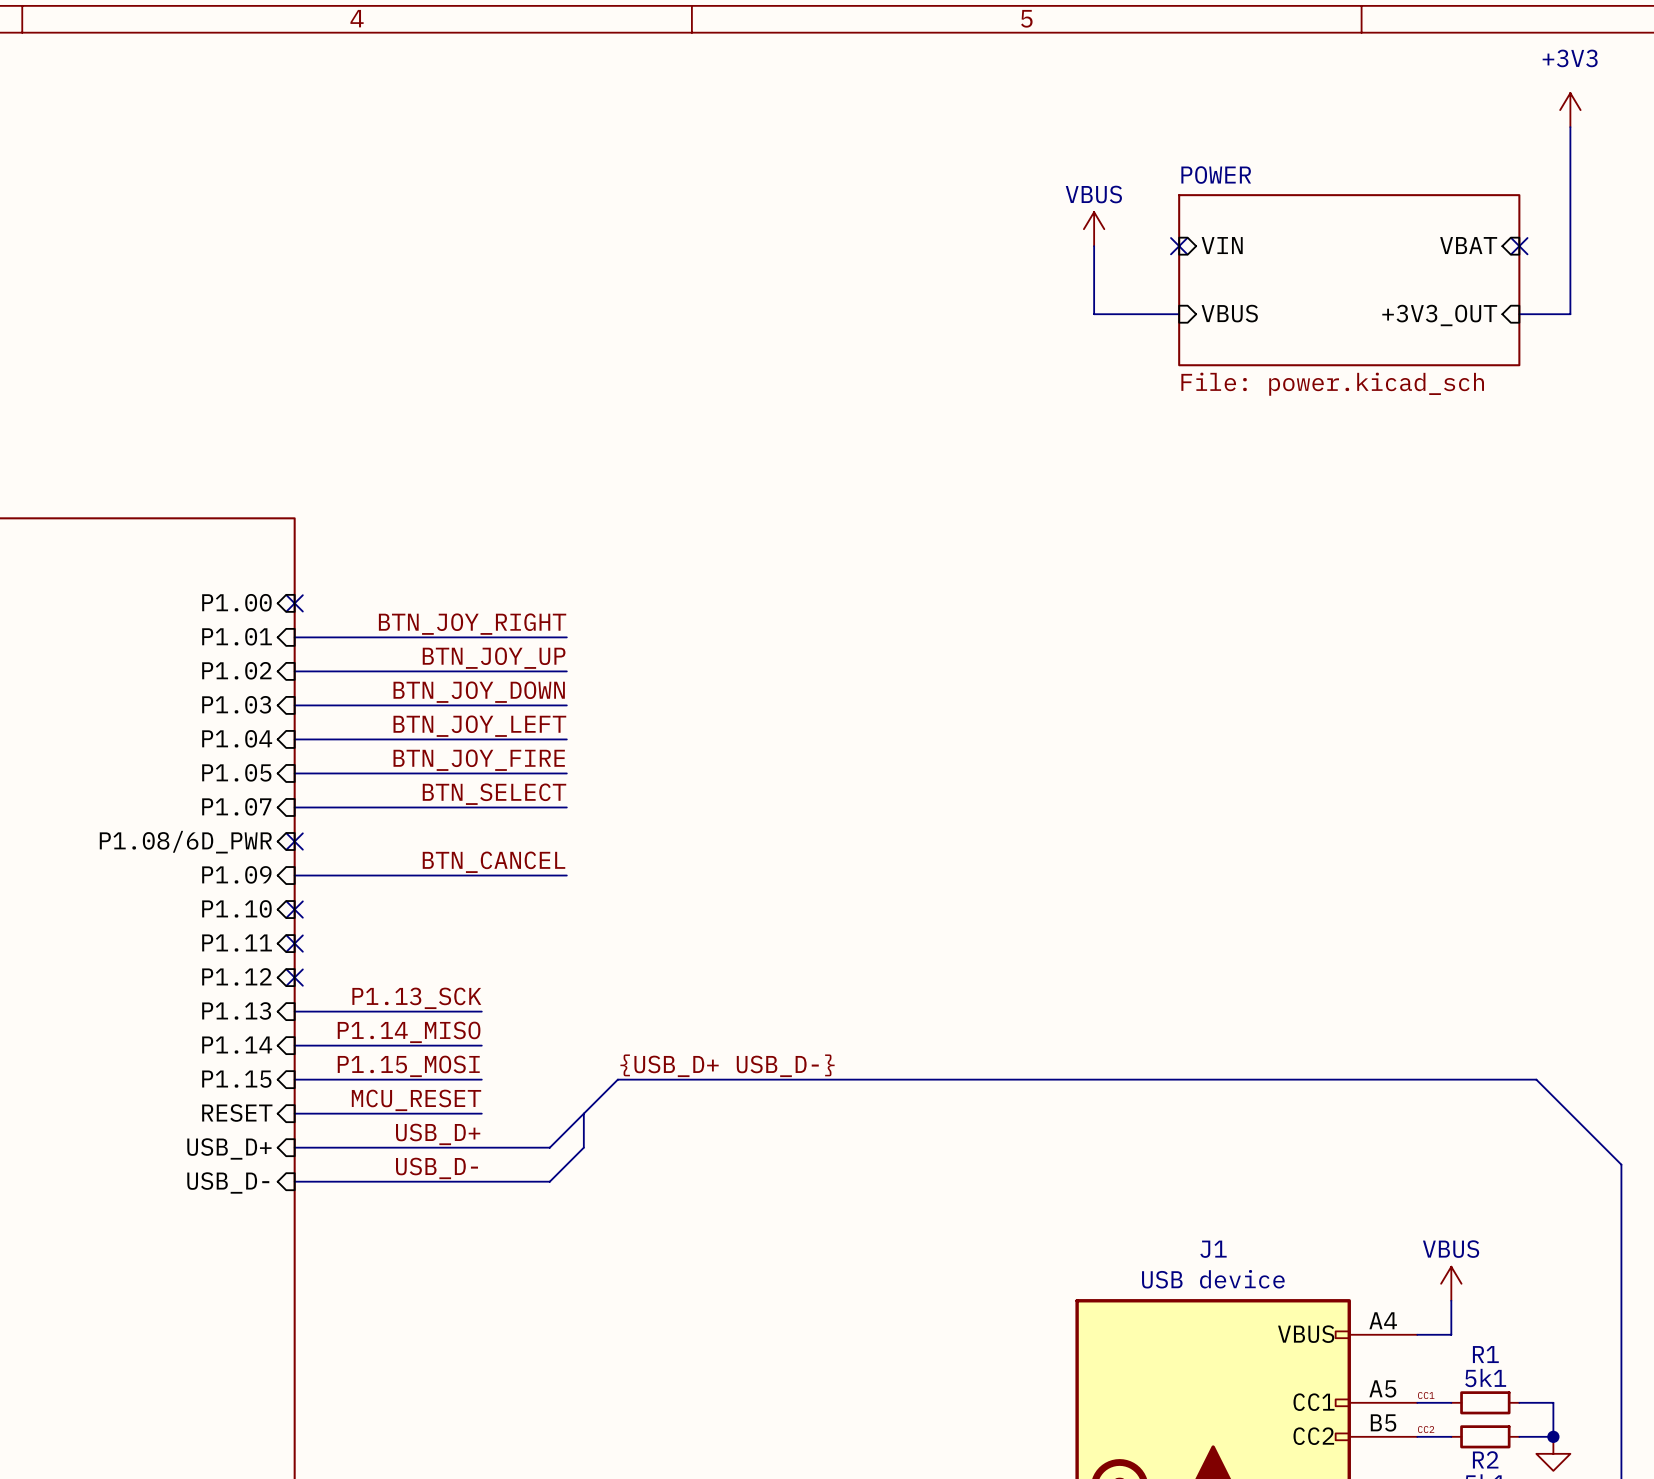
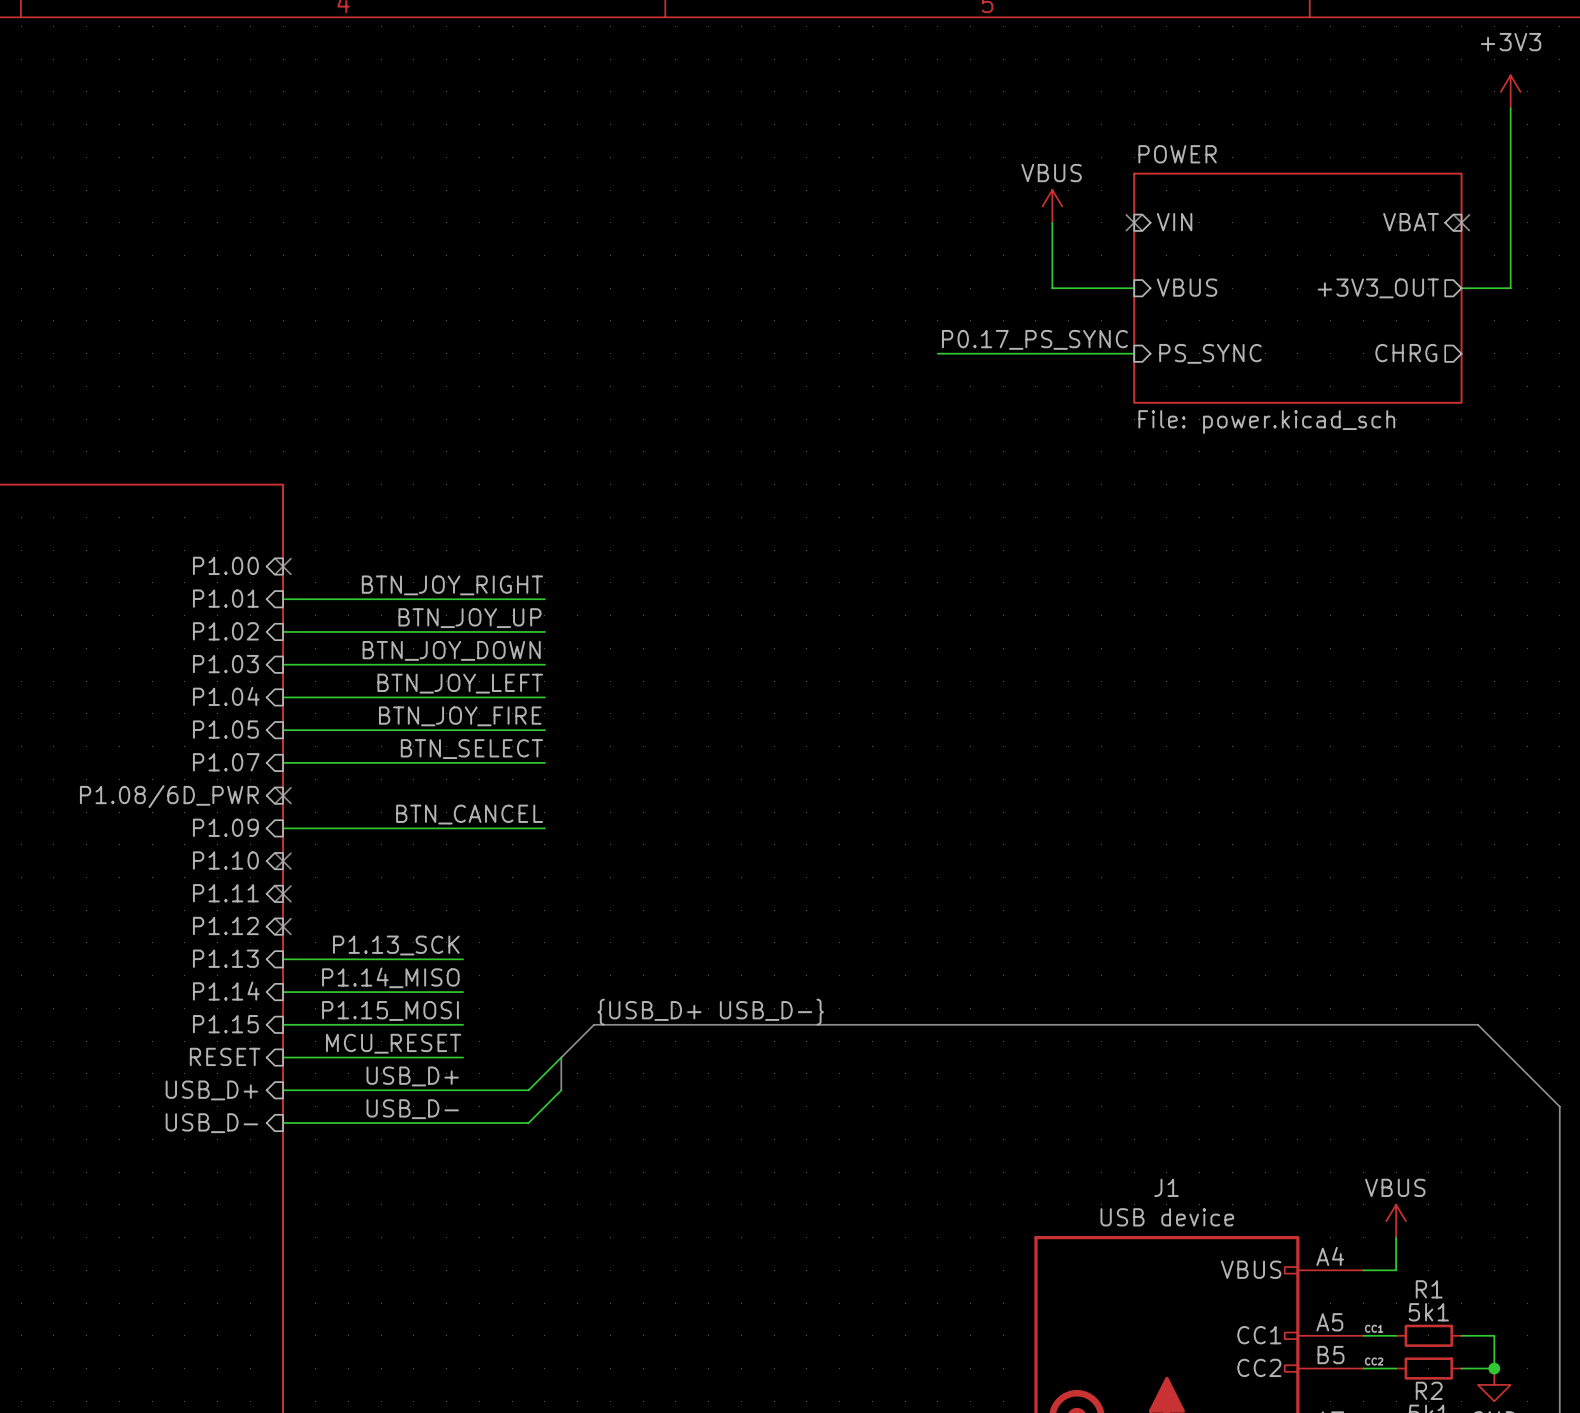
sheet POWER: File: power.kicad_sch (1349, 280) -> none
sheet POWER: none -> File: power.kicad_sch (1297, 288)
sheet pin shape: input (1439, 315) -> output (1378, 288)
label: none -> P0.17_PS_SYNC (1034, 339)
sheet pin: none -> CHRG (1406, 353)
wire: none -> (937, 353) (1134, 353)
sheet pin: none -> PS_SYNC (1210, 353)

